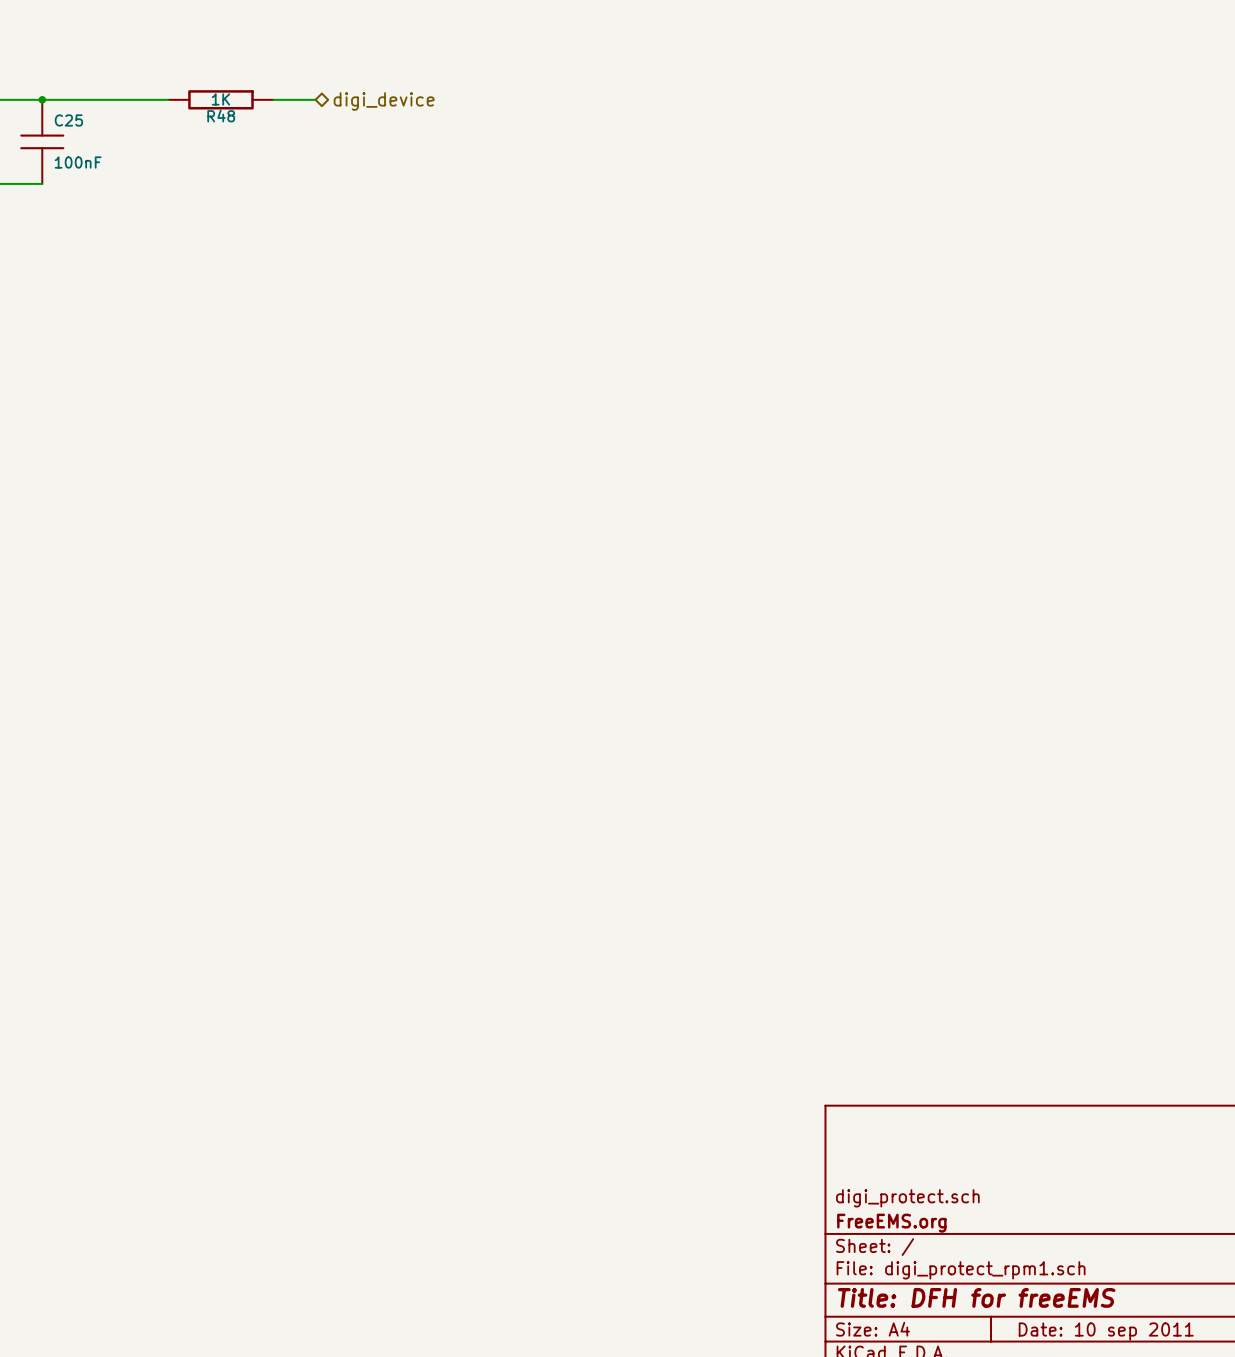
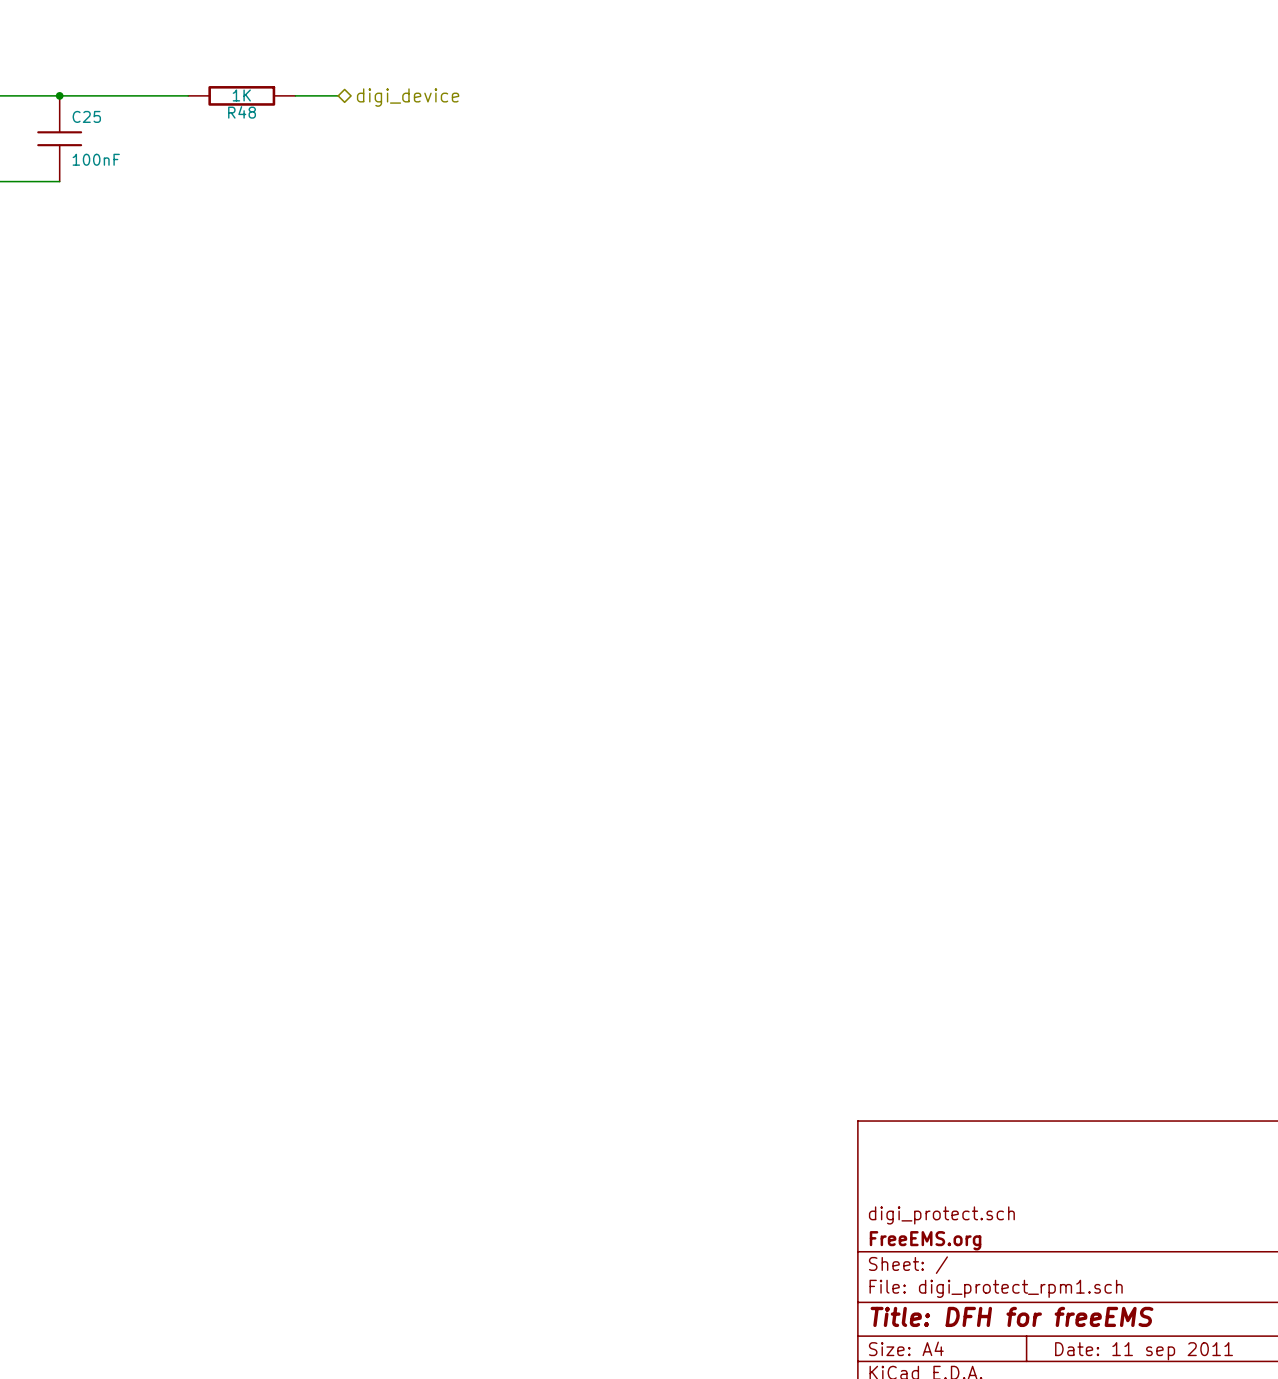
title block: Date: 10 sep 2011 (1106, 1331) -> Date: 11 sep 2011 (1144, 1351)

